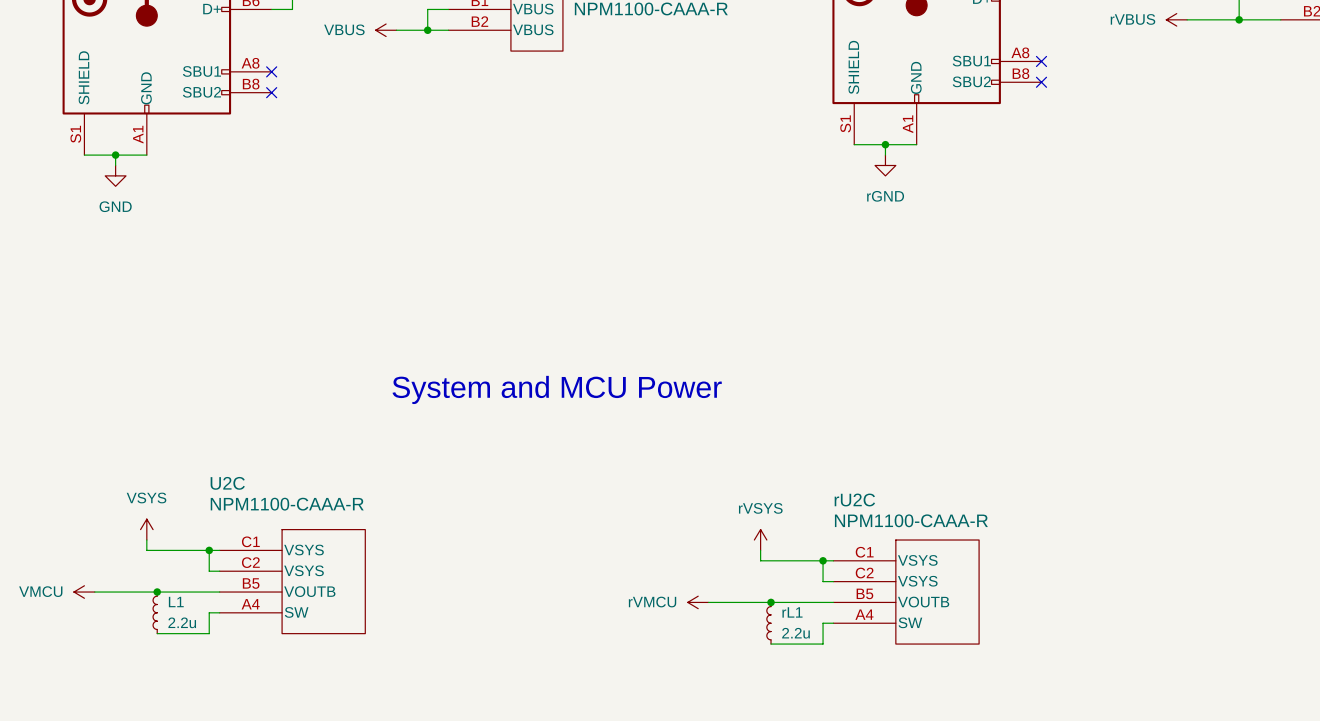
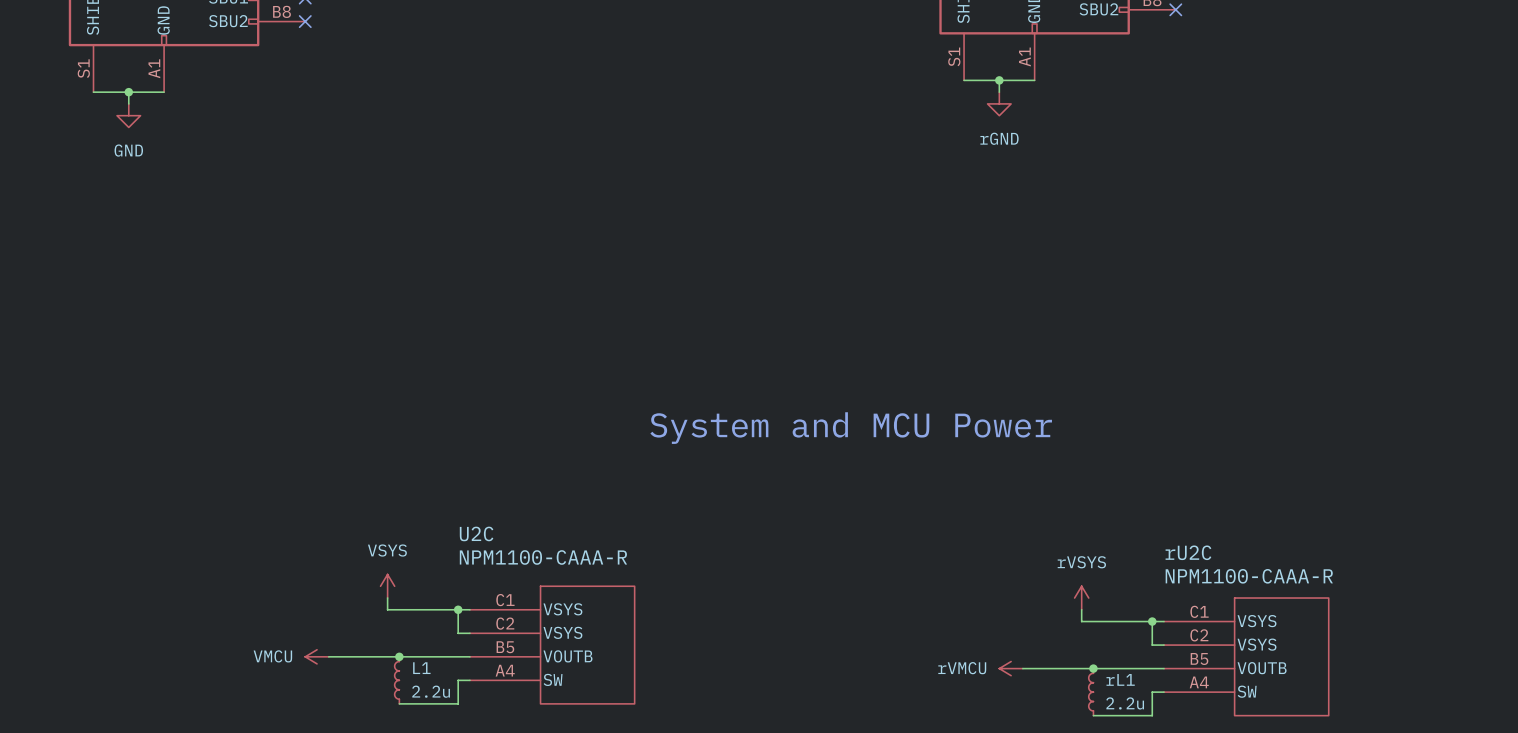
text: System and MCU Power (557, 389) -> none
text: none -> System and MCU Power (851, 428)
power symbol: VSYS (146, 529) -> none
wire: (146, 540) (146, 550) (219, 550) -> none
power symbol: rVSYS (760, 540) -> none
wire: (209, 550) (209, 571) (219, 571) -> none
junction: (209, 550) -> none
wire: (760, 550) (760, 560) (833, 560) -> none
wire: (823, 560) (823, 581) (833, 581) -> none
junction: (823, 560) -> none
U2C position: (292, 581) -> (552, 645)
power symbol: VMCU (84, 592) -> none
wire: (94, 592) (219, 592) -> none
junction: (157, 592) -> none
power symbol: none -> VSYS (387, 586)
rU2C position: (906, 592) -> (1246, 656)
wire: none -> (387, 598) (387, 609) (469, 609)
power symbol: rVMCU (698, 602) -> none
wire: (708, 602) (833, 602) -> none
junction: (771, 602) -> none
power symbol: none -> rVSYS (1081, 598)
L1 position: (155, 612) -> (397, 680)
wire: (219, 612) (209, 612) (209, 633) (157, 633) -> none
wire: none -> (458, 609) (458, 633) (469, 633)
junction: none -> (458, 609)
wire: none -> (1081, 609) (1081, 621) (1164, 621)
rL1 position: (768, 623) -> (1091, 692)
wire: (833, 623) (823, 623) (823, 644) (771, 644) -> none
wire: none -> (1152, 621) (1152, 645) (1164, 645)
junction: none -> (1152, 621)
power symbol: none -> VMCU (317, 656)
wire: none -> (328, 656) (469, 656)
junction: none -> (399, 656)
power symbol: none -> rVMCU (1011, 668)
wire: none -> (1022, 668) (1164, 668)
junction: none -> (1093, 668)
wire: none -> (469, 680) (458, 680) (458, 703) (399, 703)
wire: none -> (1164, 692) (1152, 692) (1152, 715) (1093, 715)

